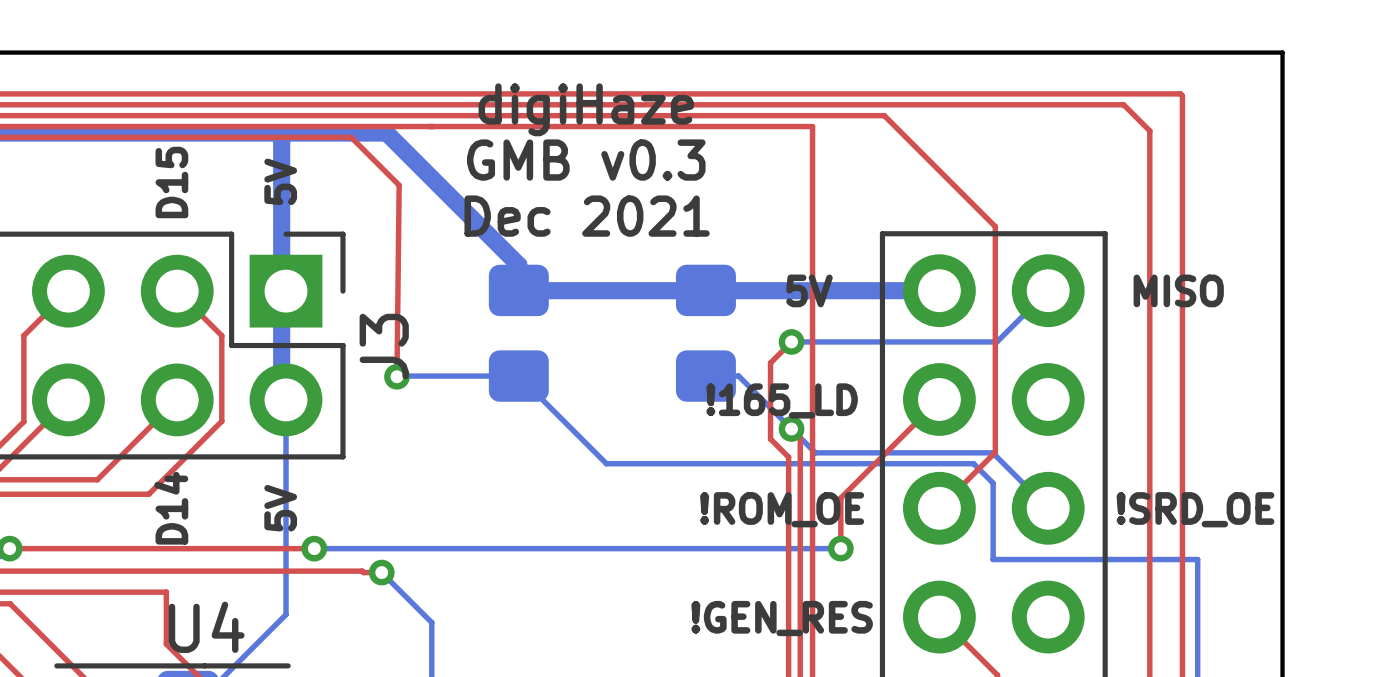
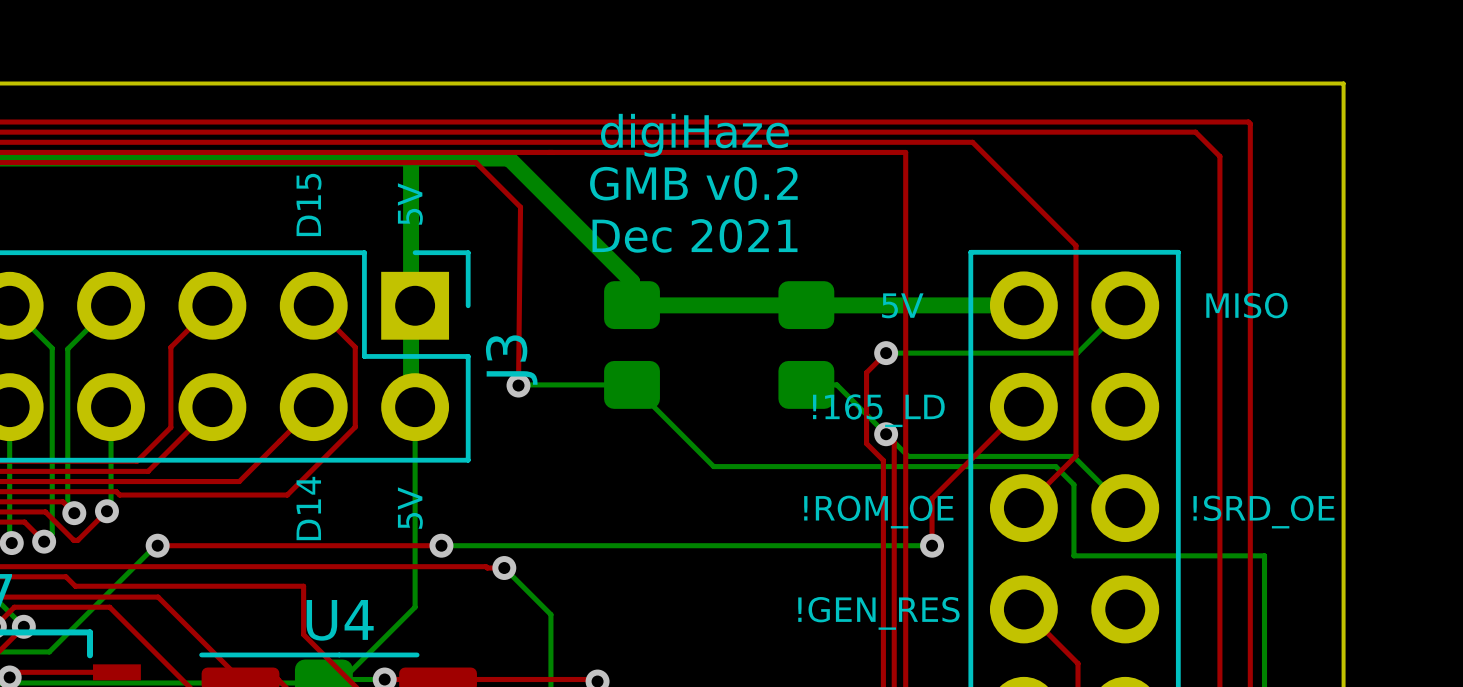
text: GMB v0.3 (586, 160) -> GMB v0.2 (693, 183)

